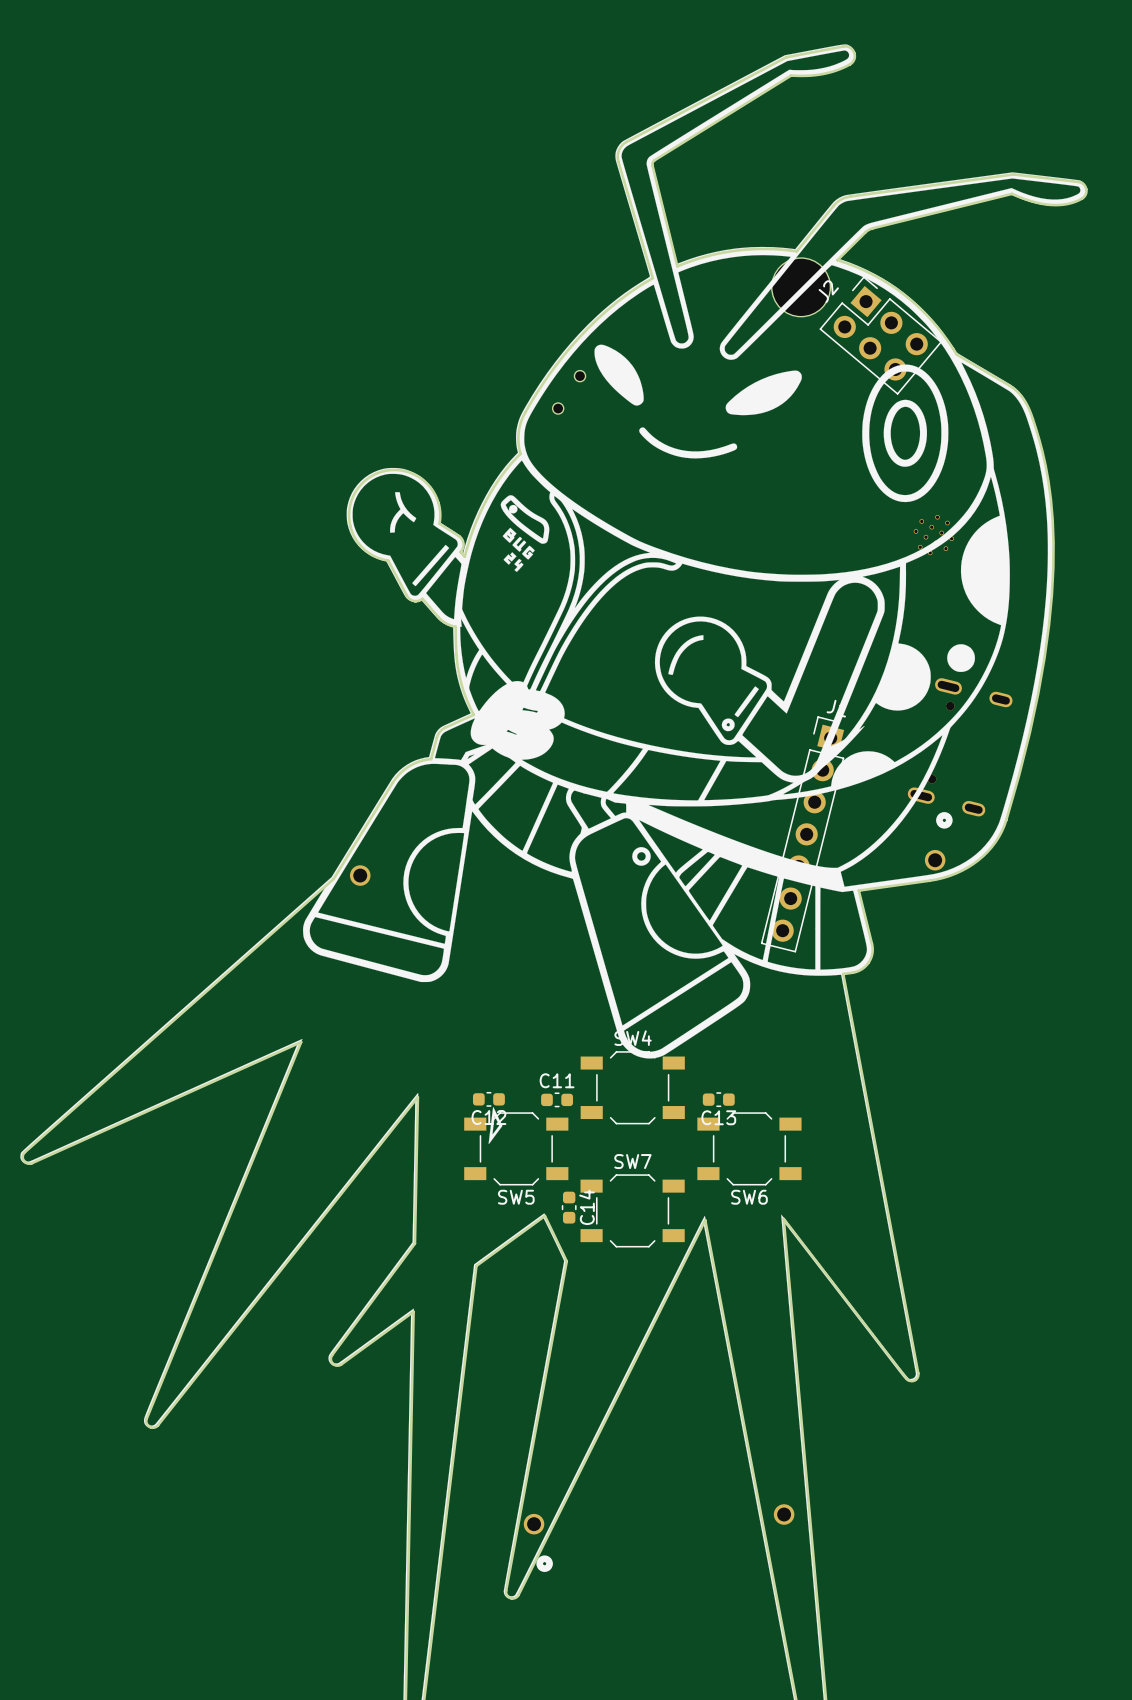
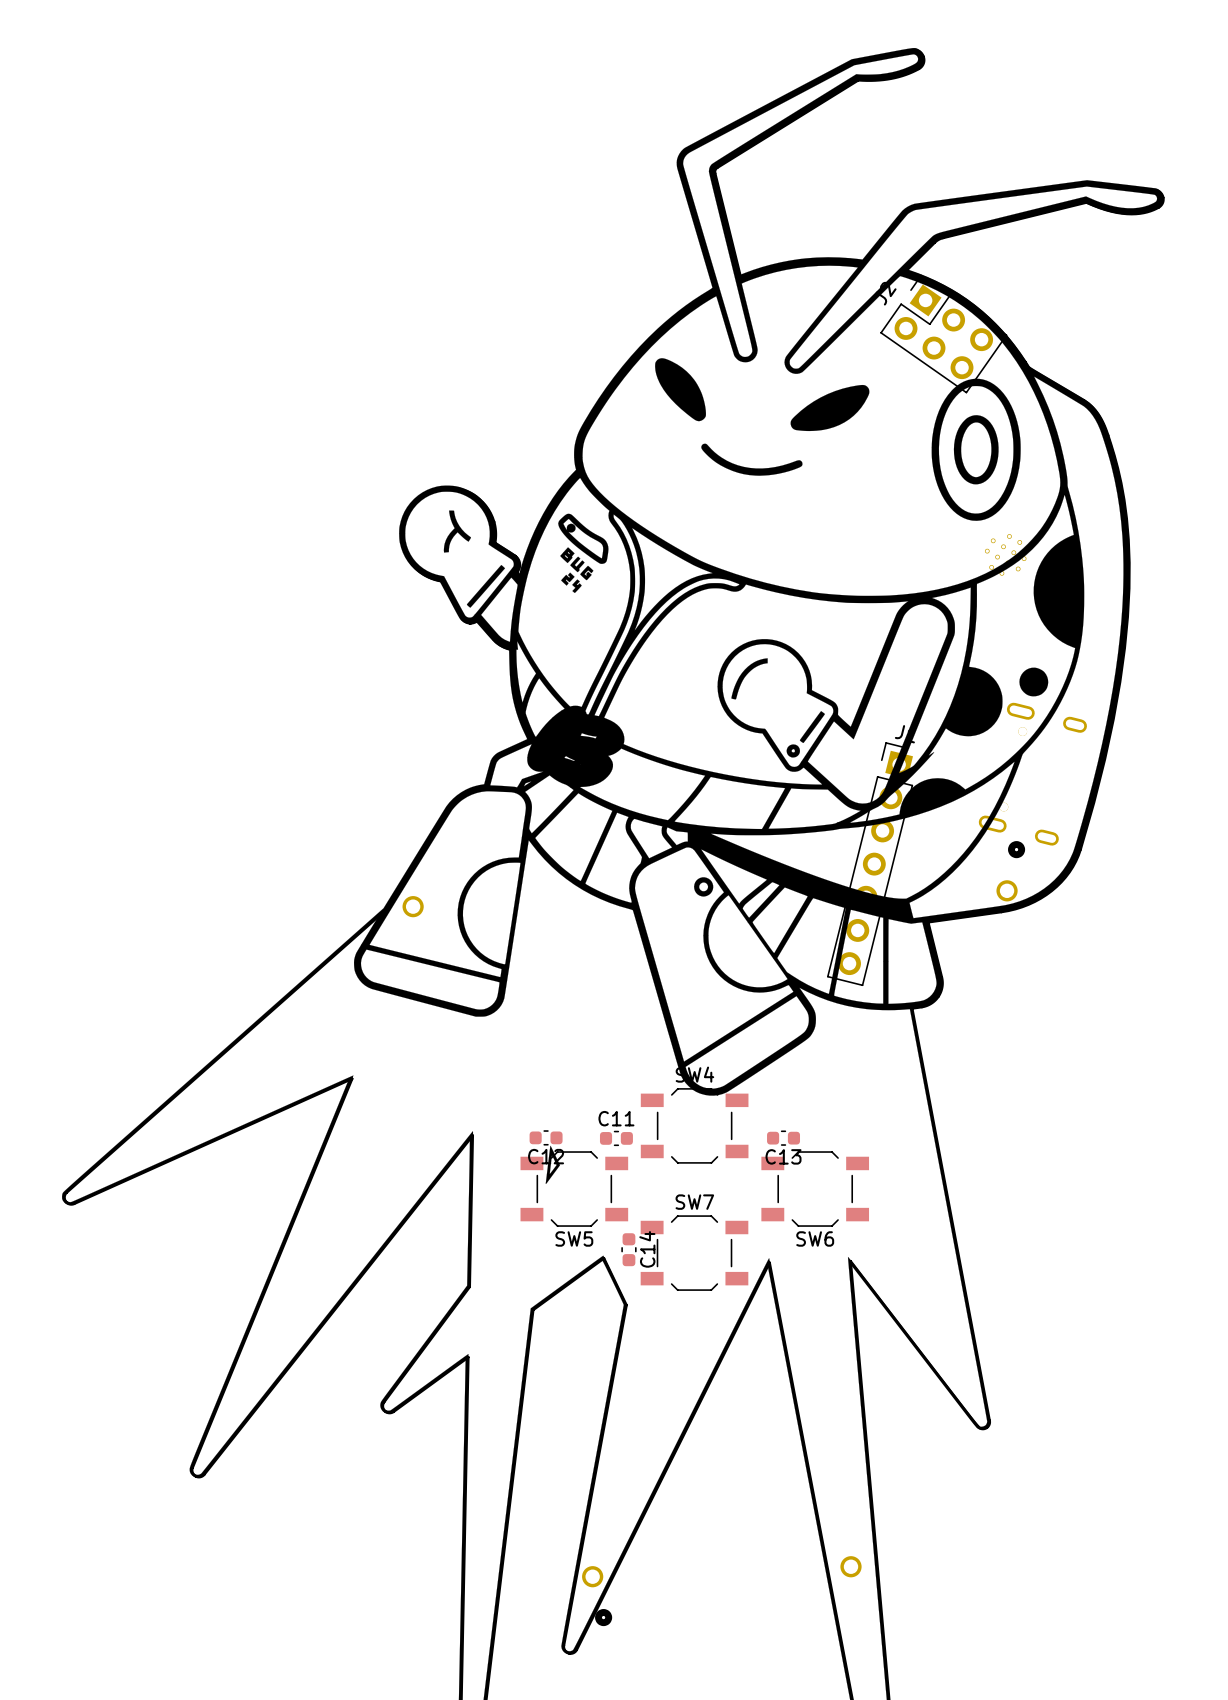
part: (801, 287) -> none
J2 rotation: 0° (880, 335) -> 5° counterclockwise (943, 334)
part: (569, 392) -> none

